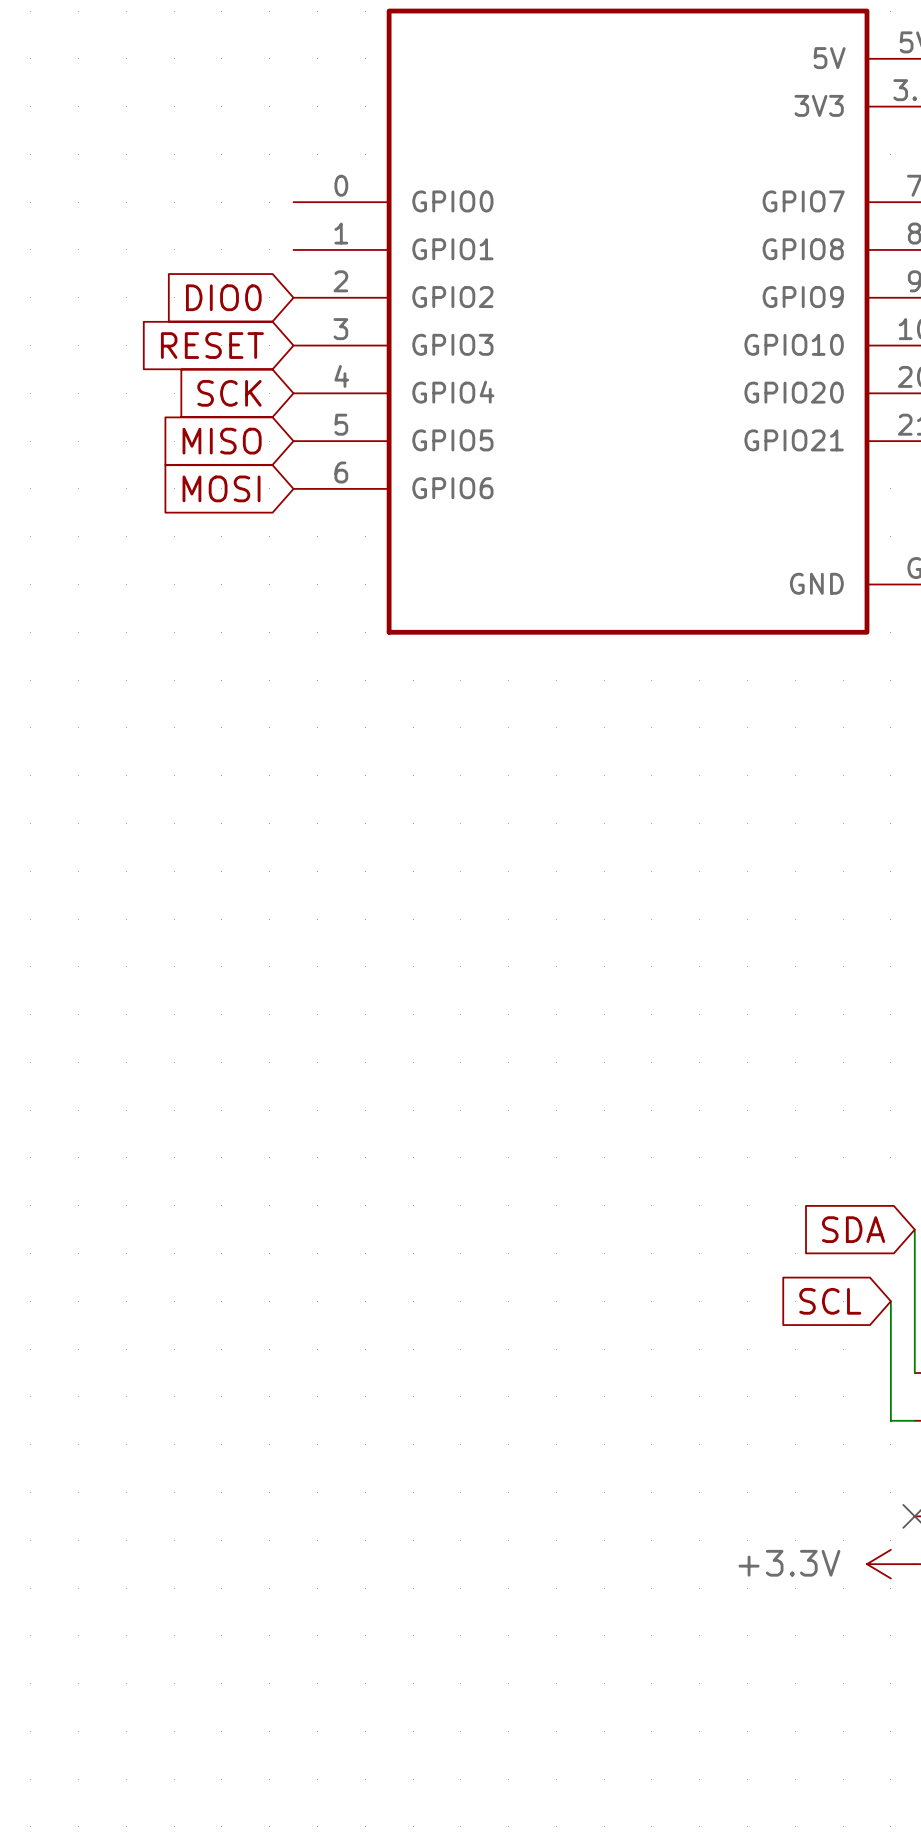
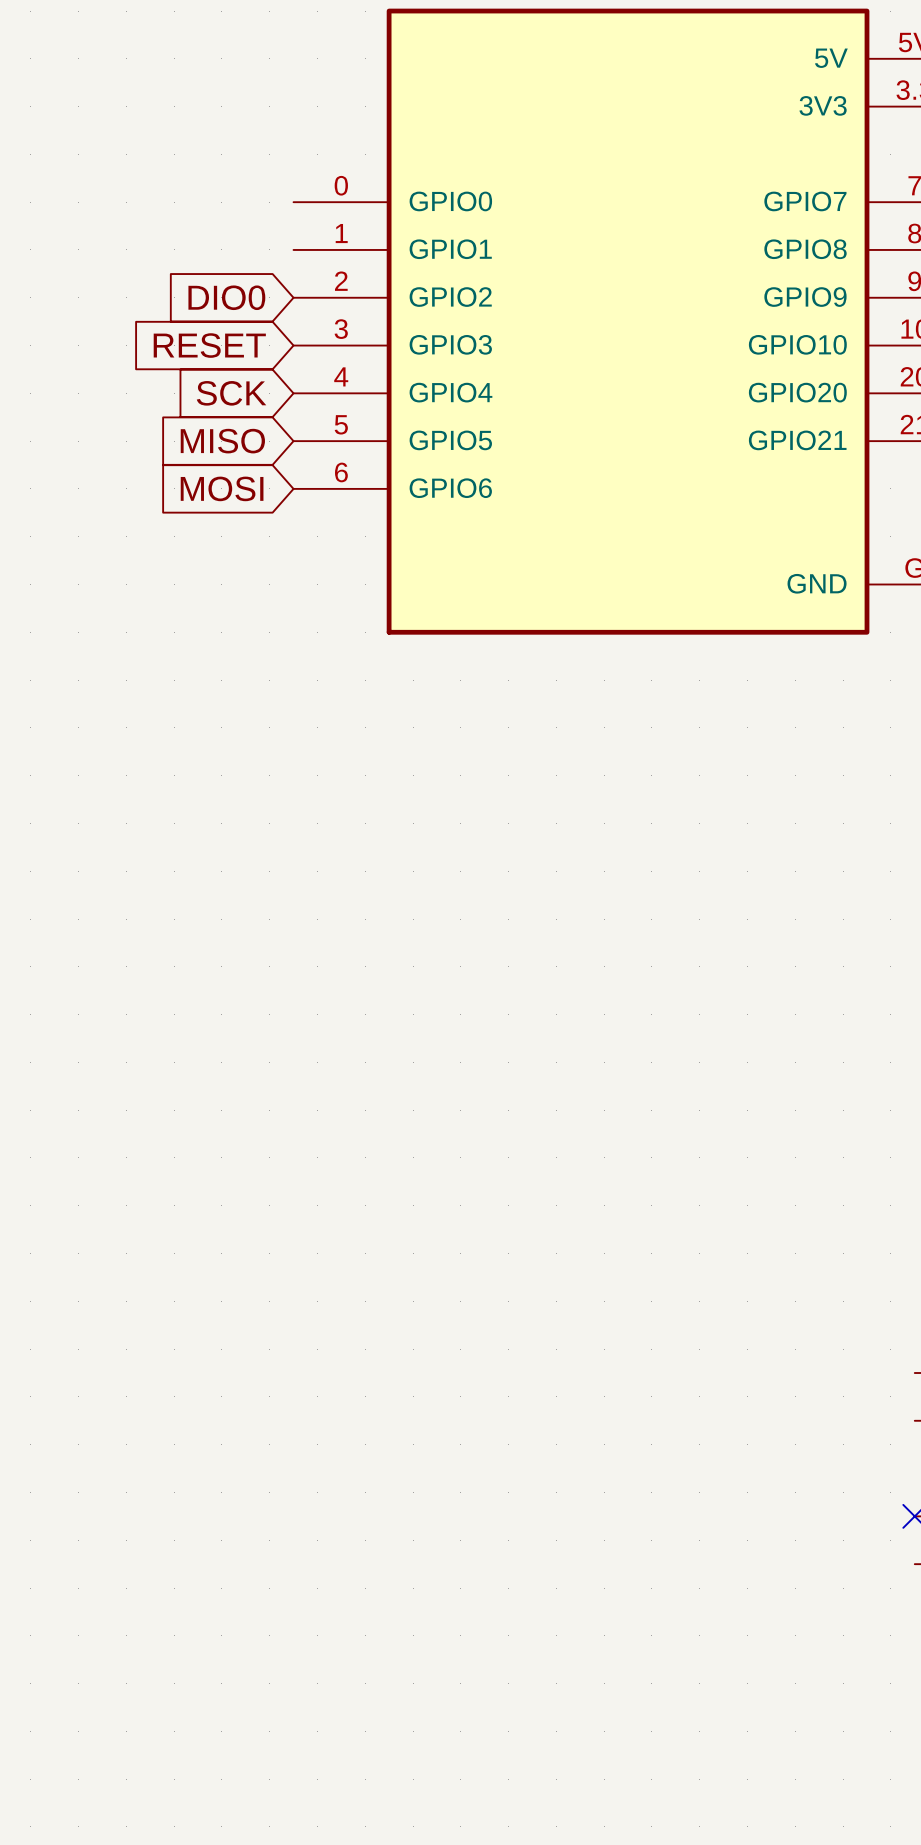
global label: SDA (853, 1229) -> none
wire: (914, 1229) (914, 1373) -> none
global label: SCL (830, 1301) -> none
wire: (890, 1301) (890, 1420) (914, 1420) -> none
power symbol: +3.3V (890, 1564) -> none

